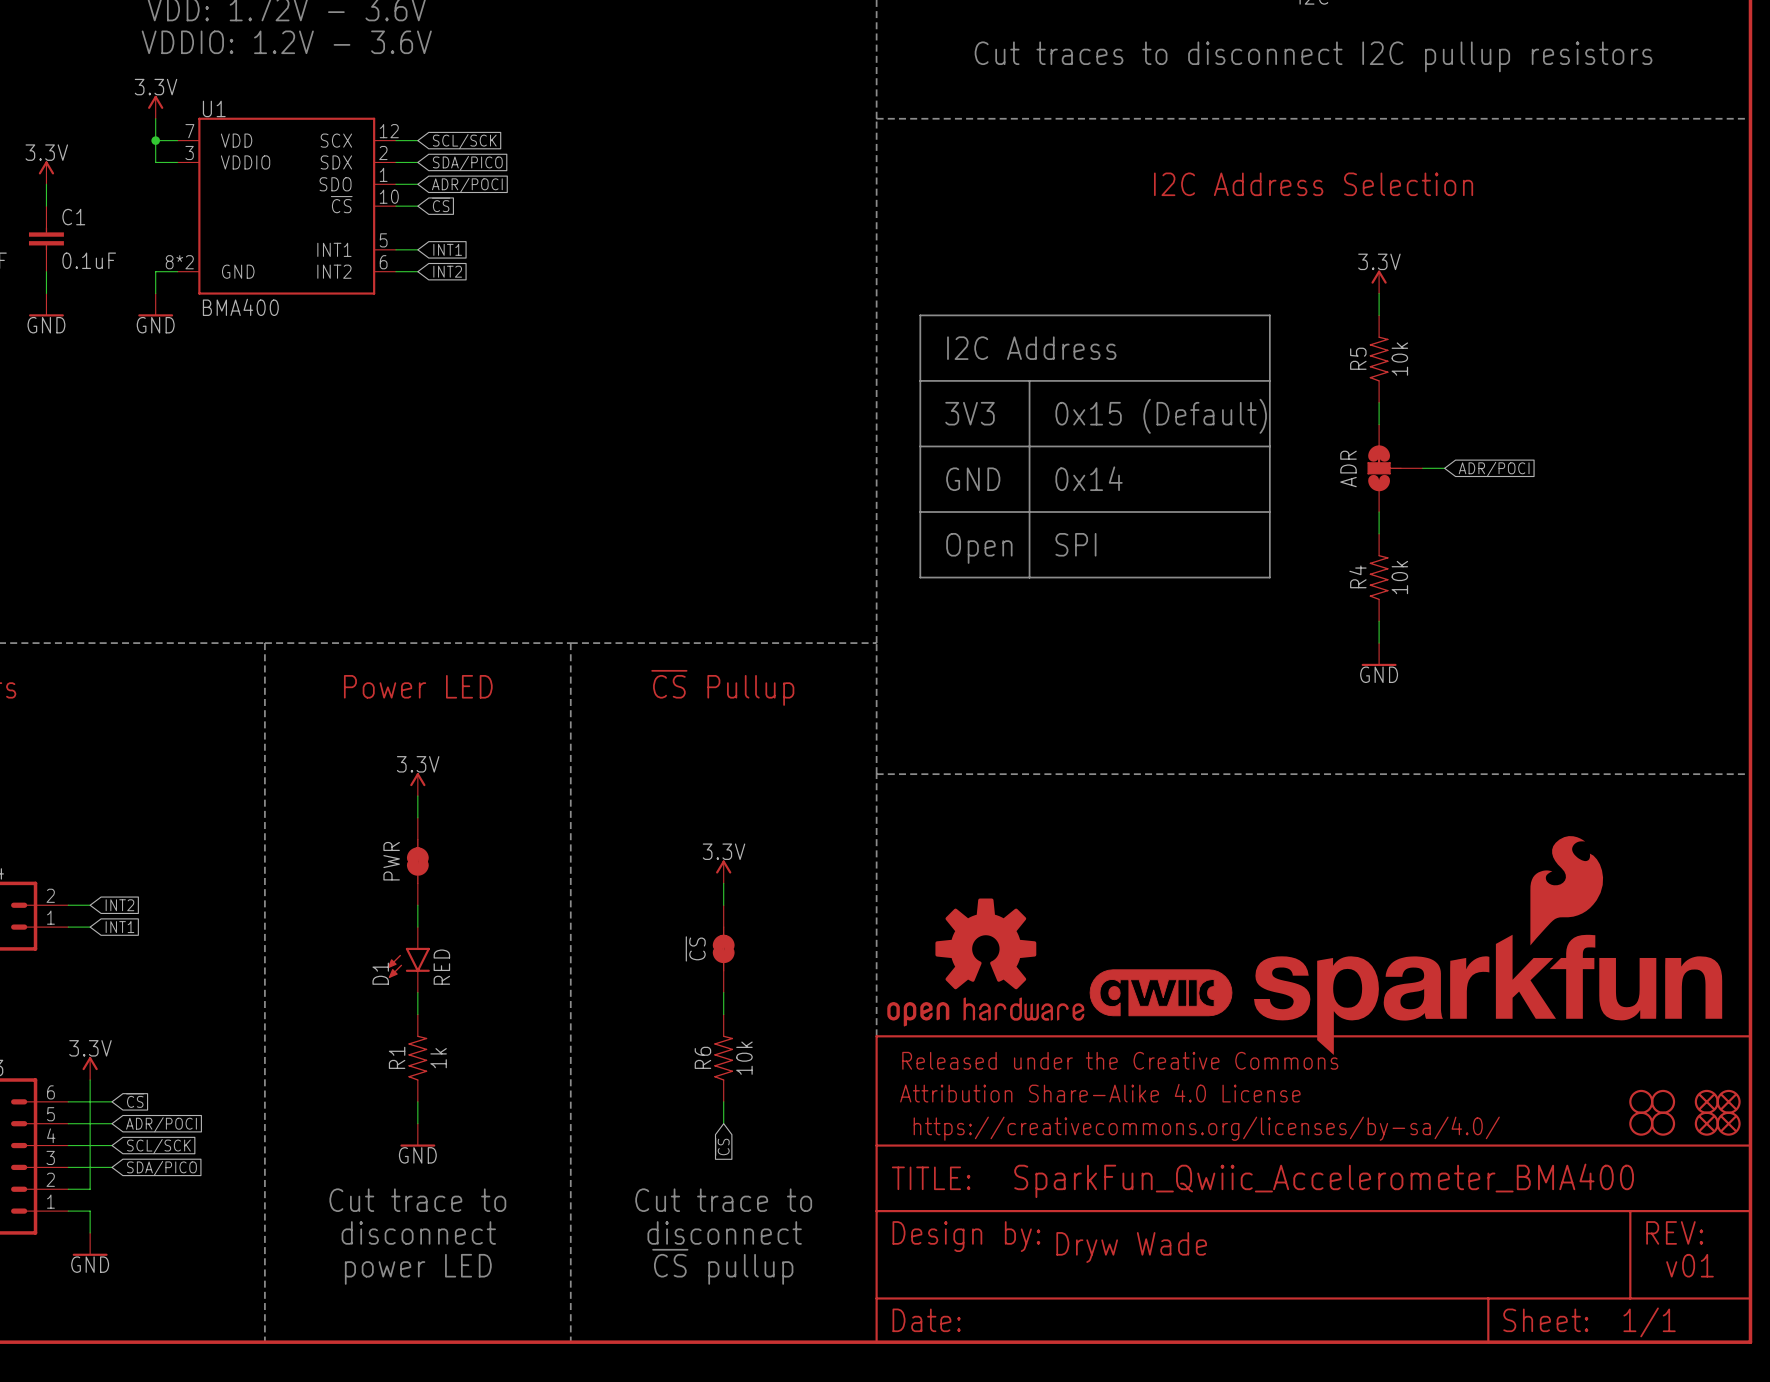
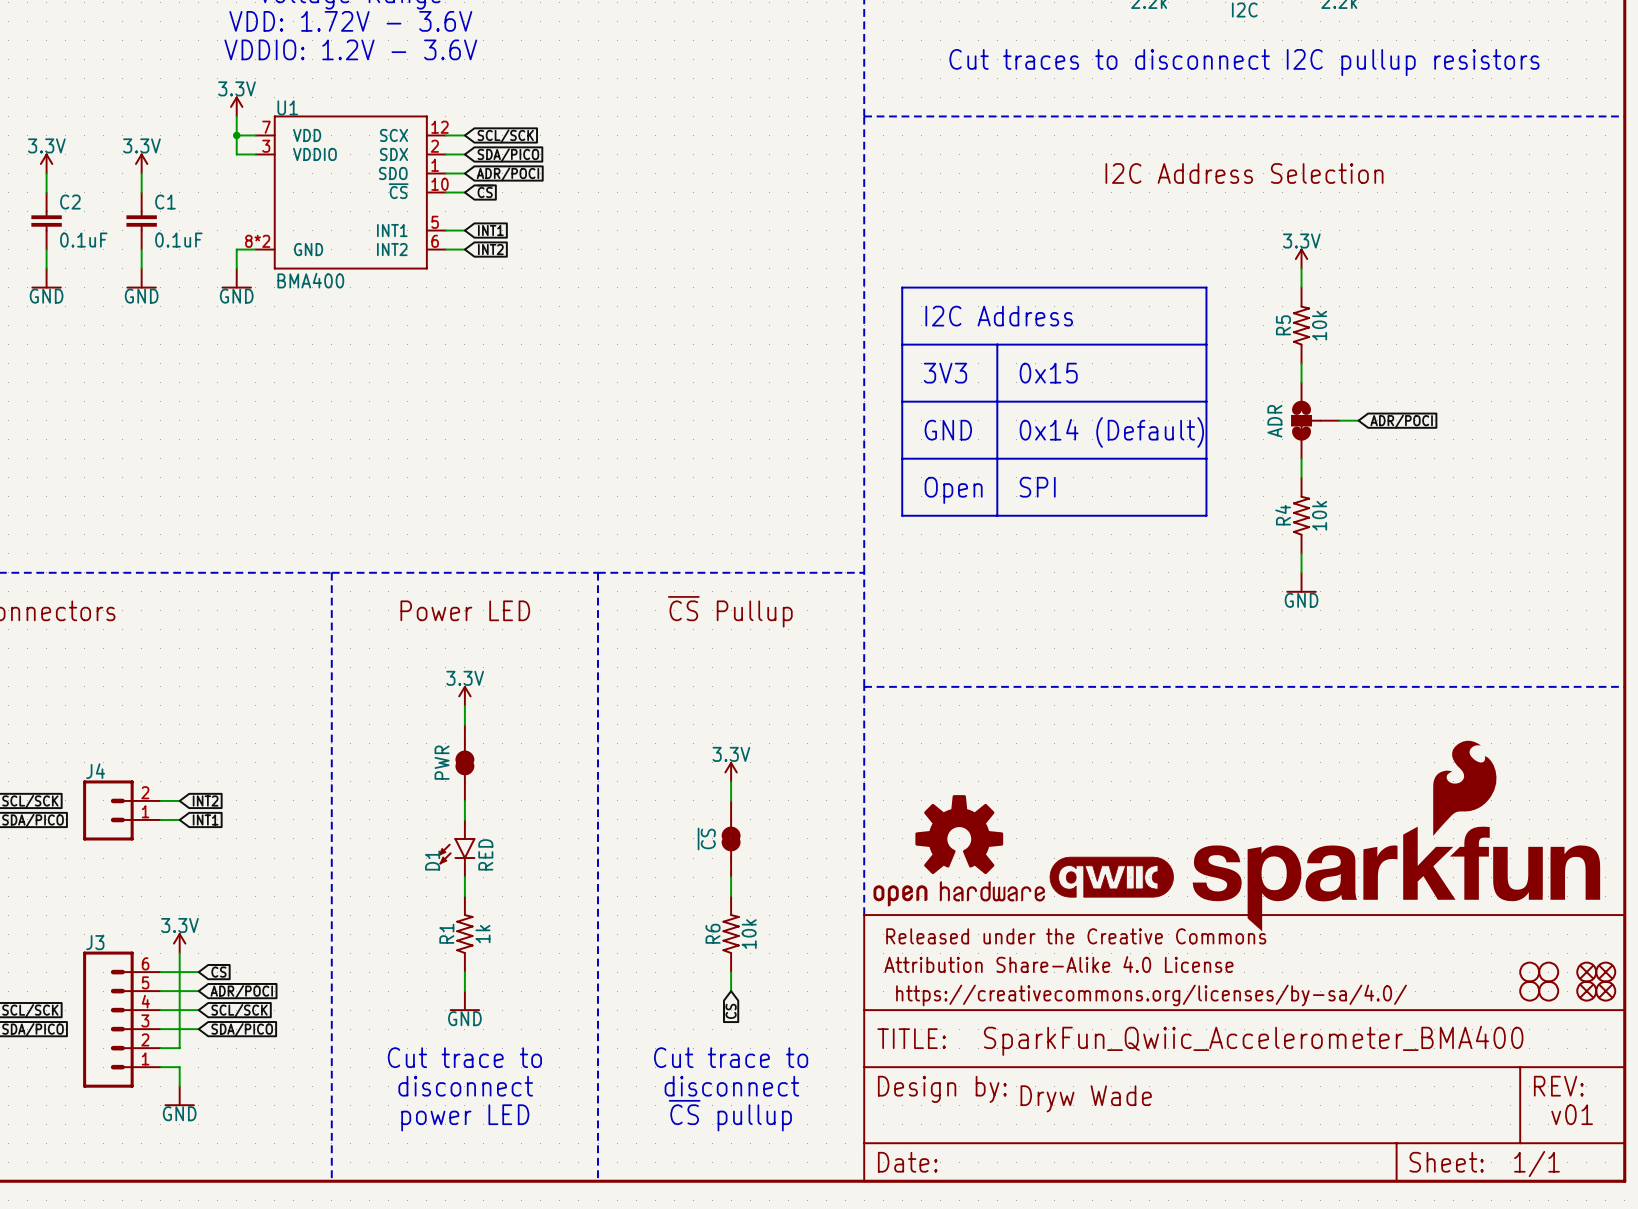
text: 0x15 (Default) (1161, 416) -> 0x15 (1048, 373)
ADR flip: as is (1384, 468) -> up-down (1306, 420)
text: 0x14 (1089, 478) -> 0x14 (Default) (1111, 432)

